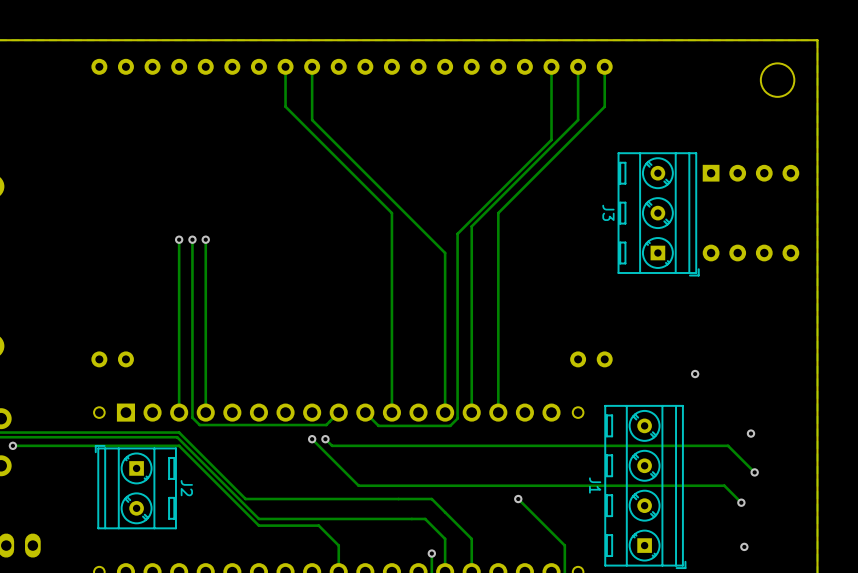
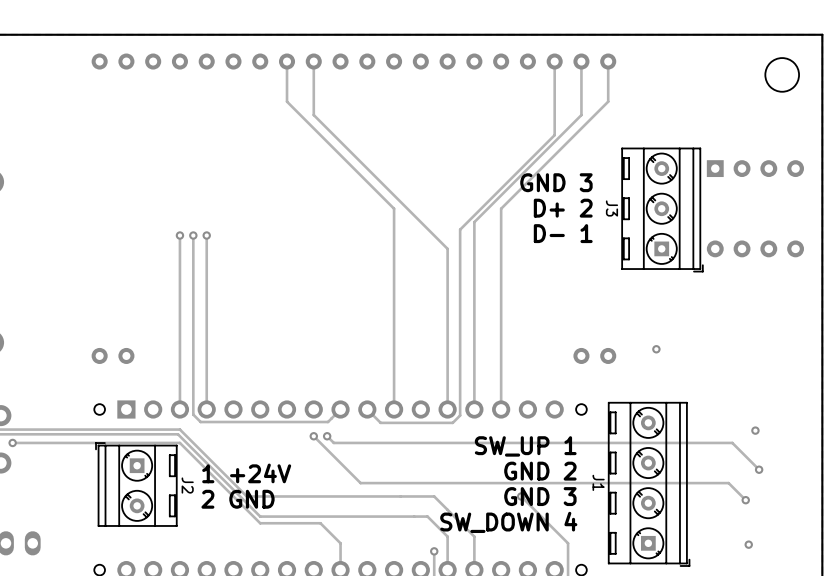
text: none -> GND 3 (556, 182)
text: none -> D+ 2 (563, 208)
text: none -> D- 1 (563, 233)
via position: (695, 374) -> (656, 349)
text: none -> SW_UP 1 (525, 446)
text: none -> GND 2 (540, 471)
text: none -> 1 +24V (246, 473)
text: none -> GND 3 (540, 496)
text: none -> 2 GND (238, 499)
text: none -> SW_DOWN 4 (508, 522)

